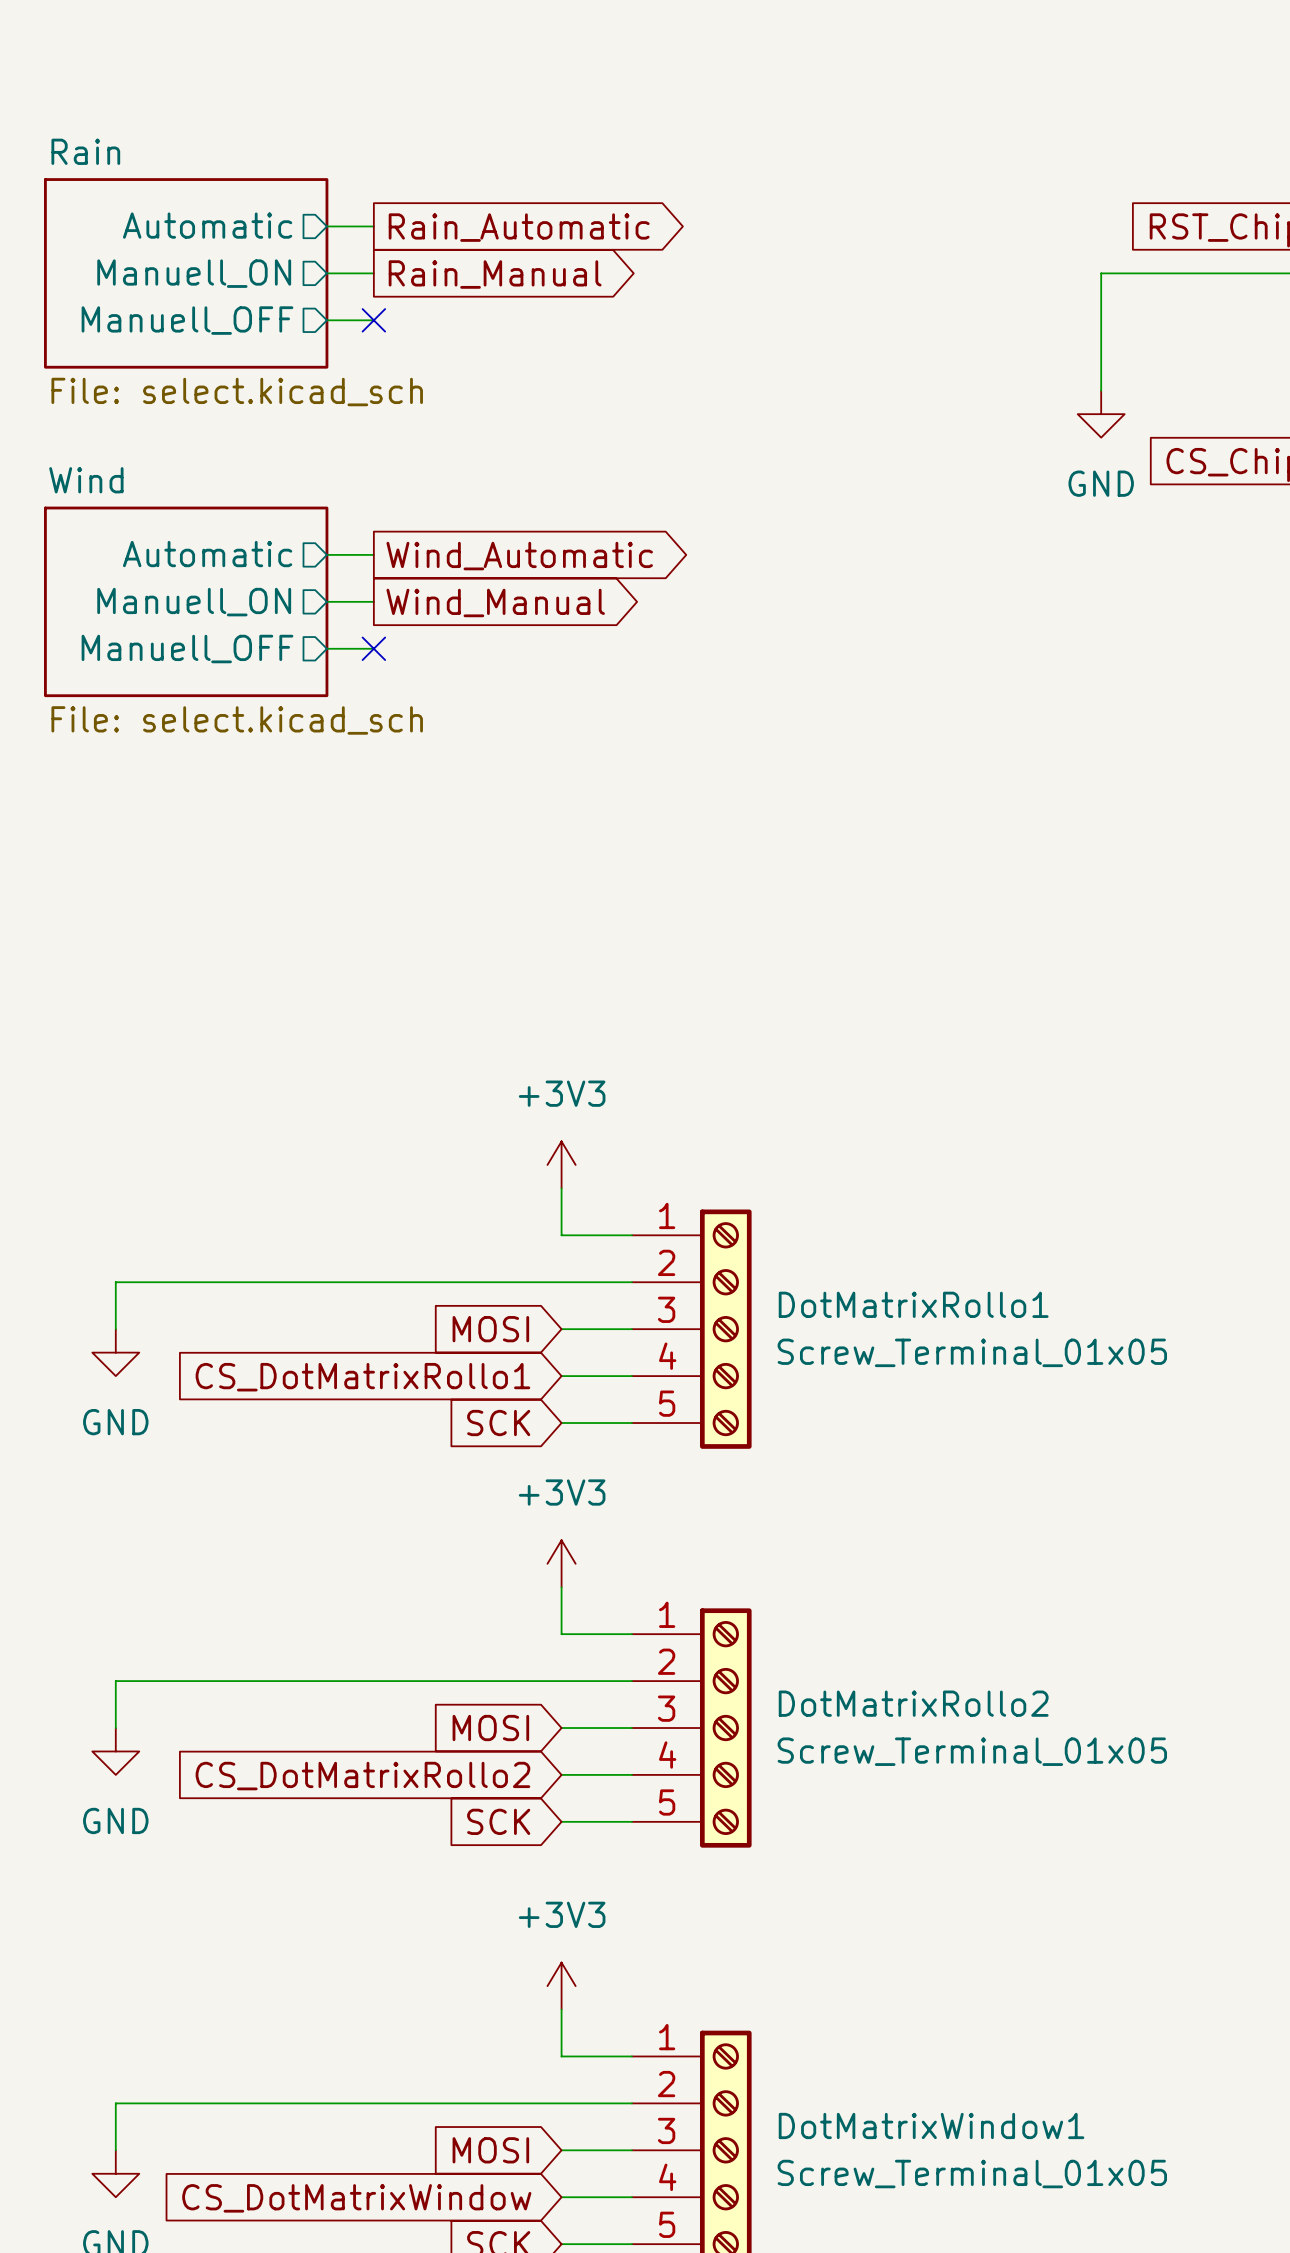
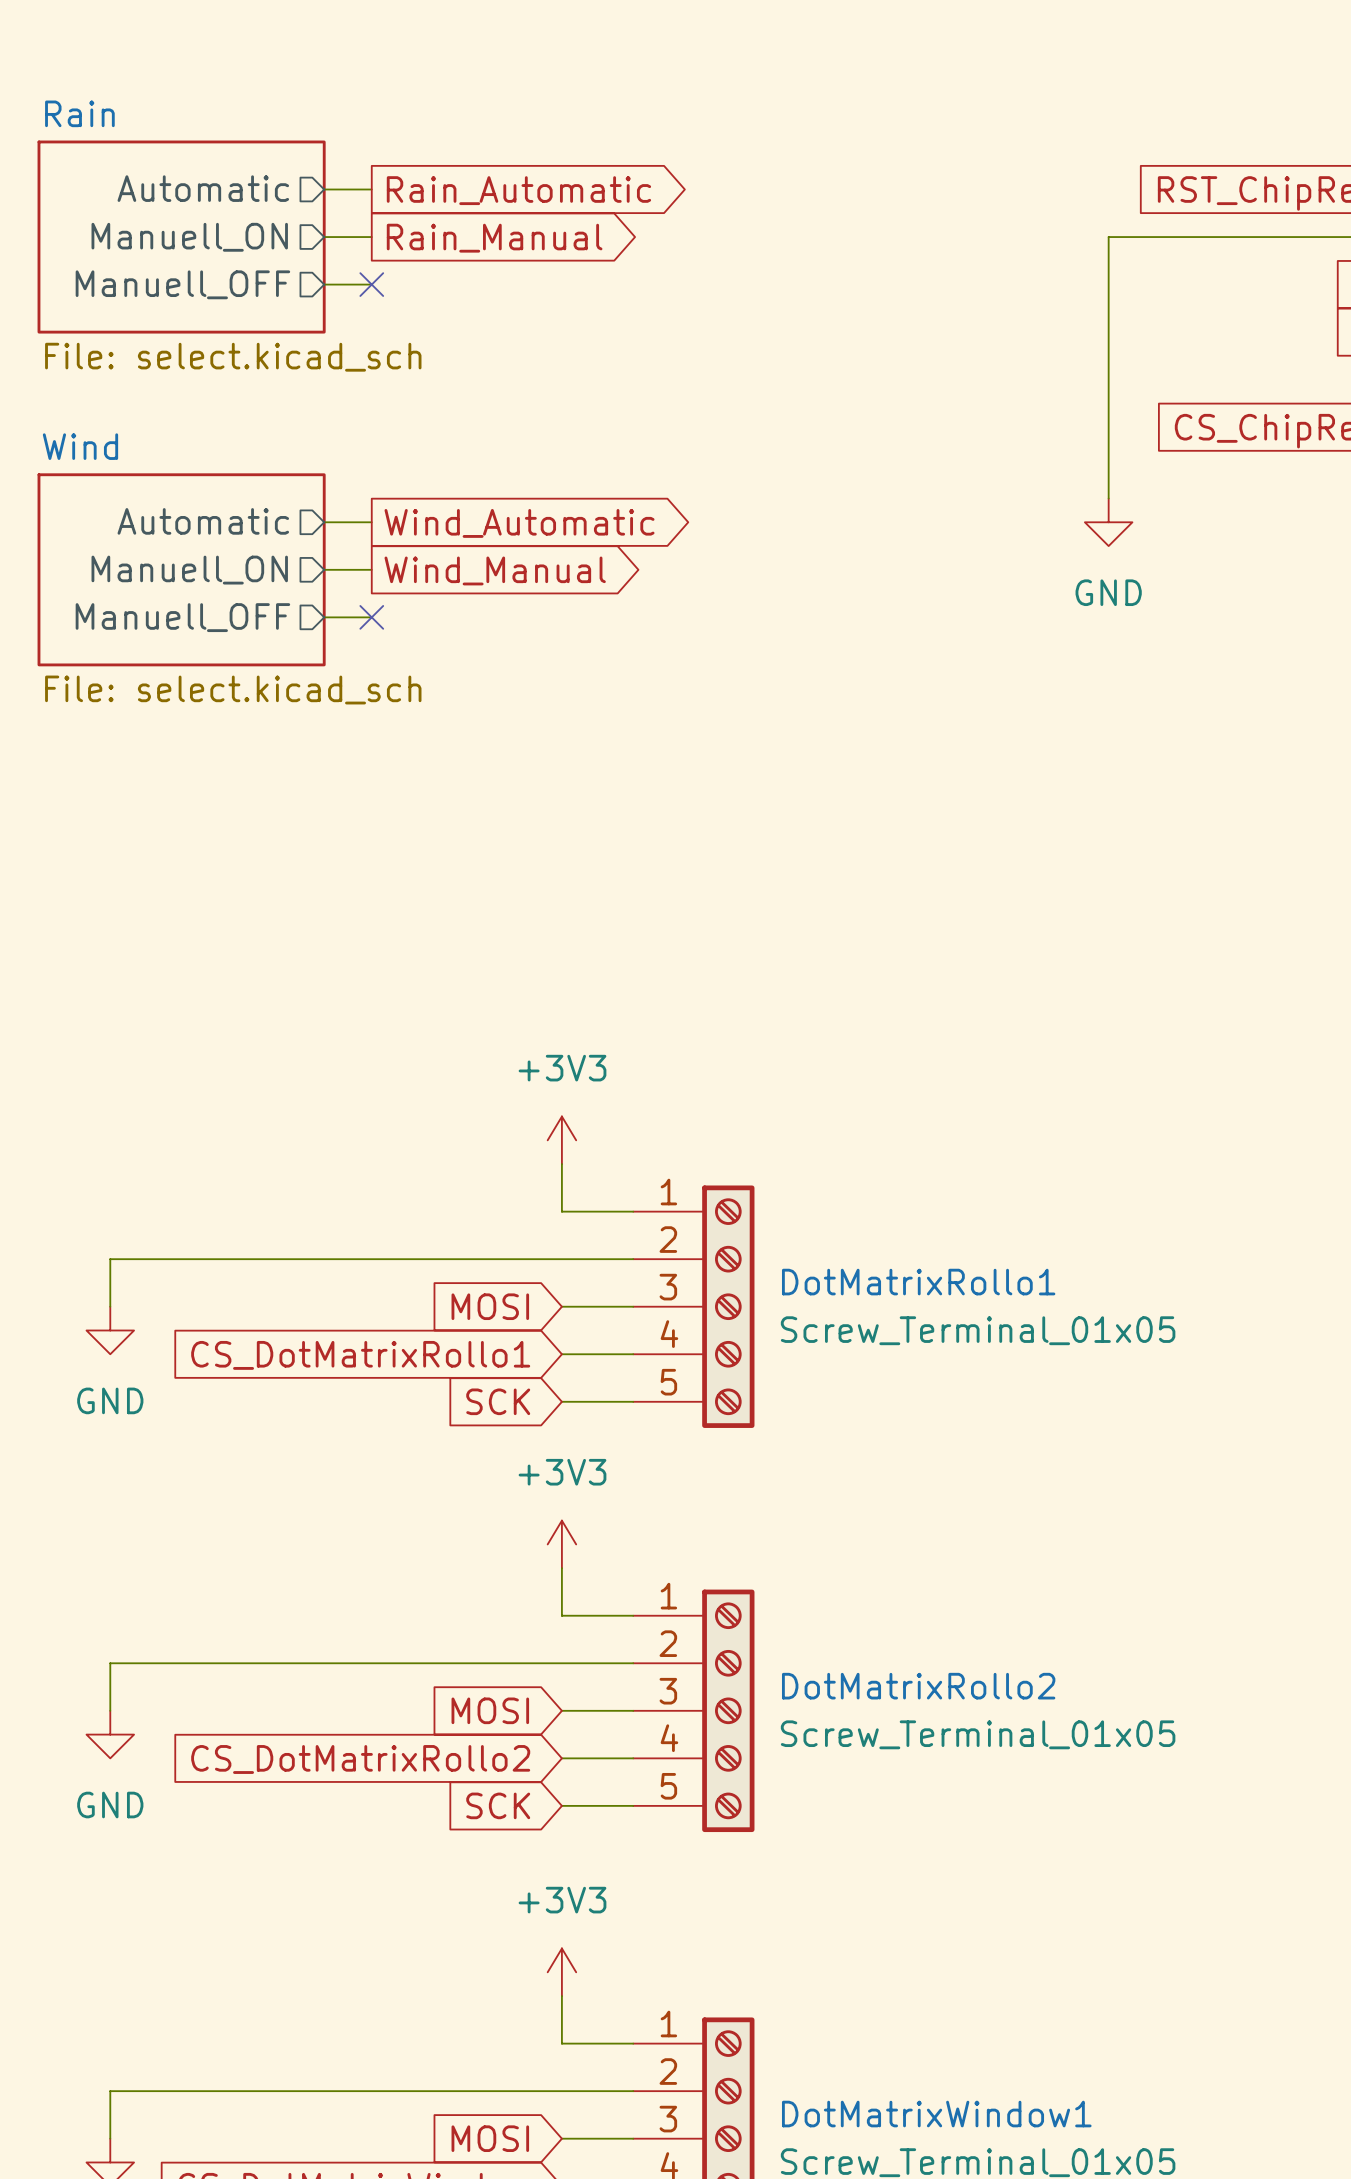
wire: none -> (1108, 355) (1108, 498)
power symbol position: GND (1101, 414) -> GND (1108, 522)

